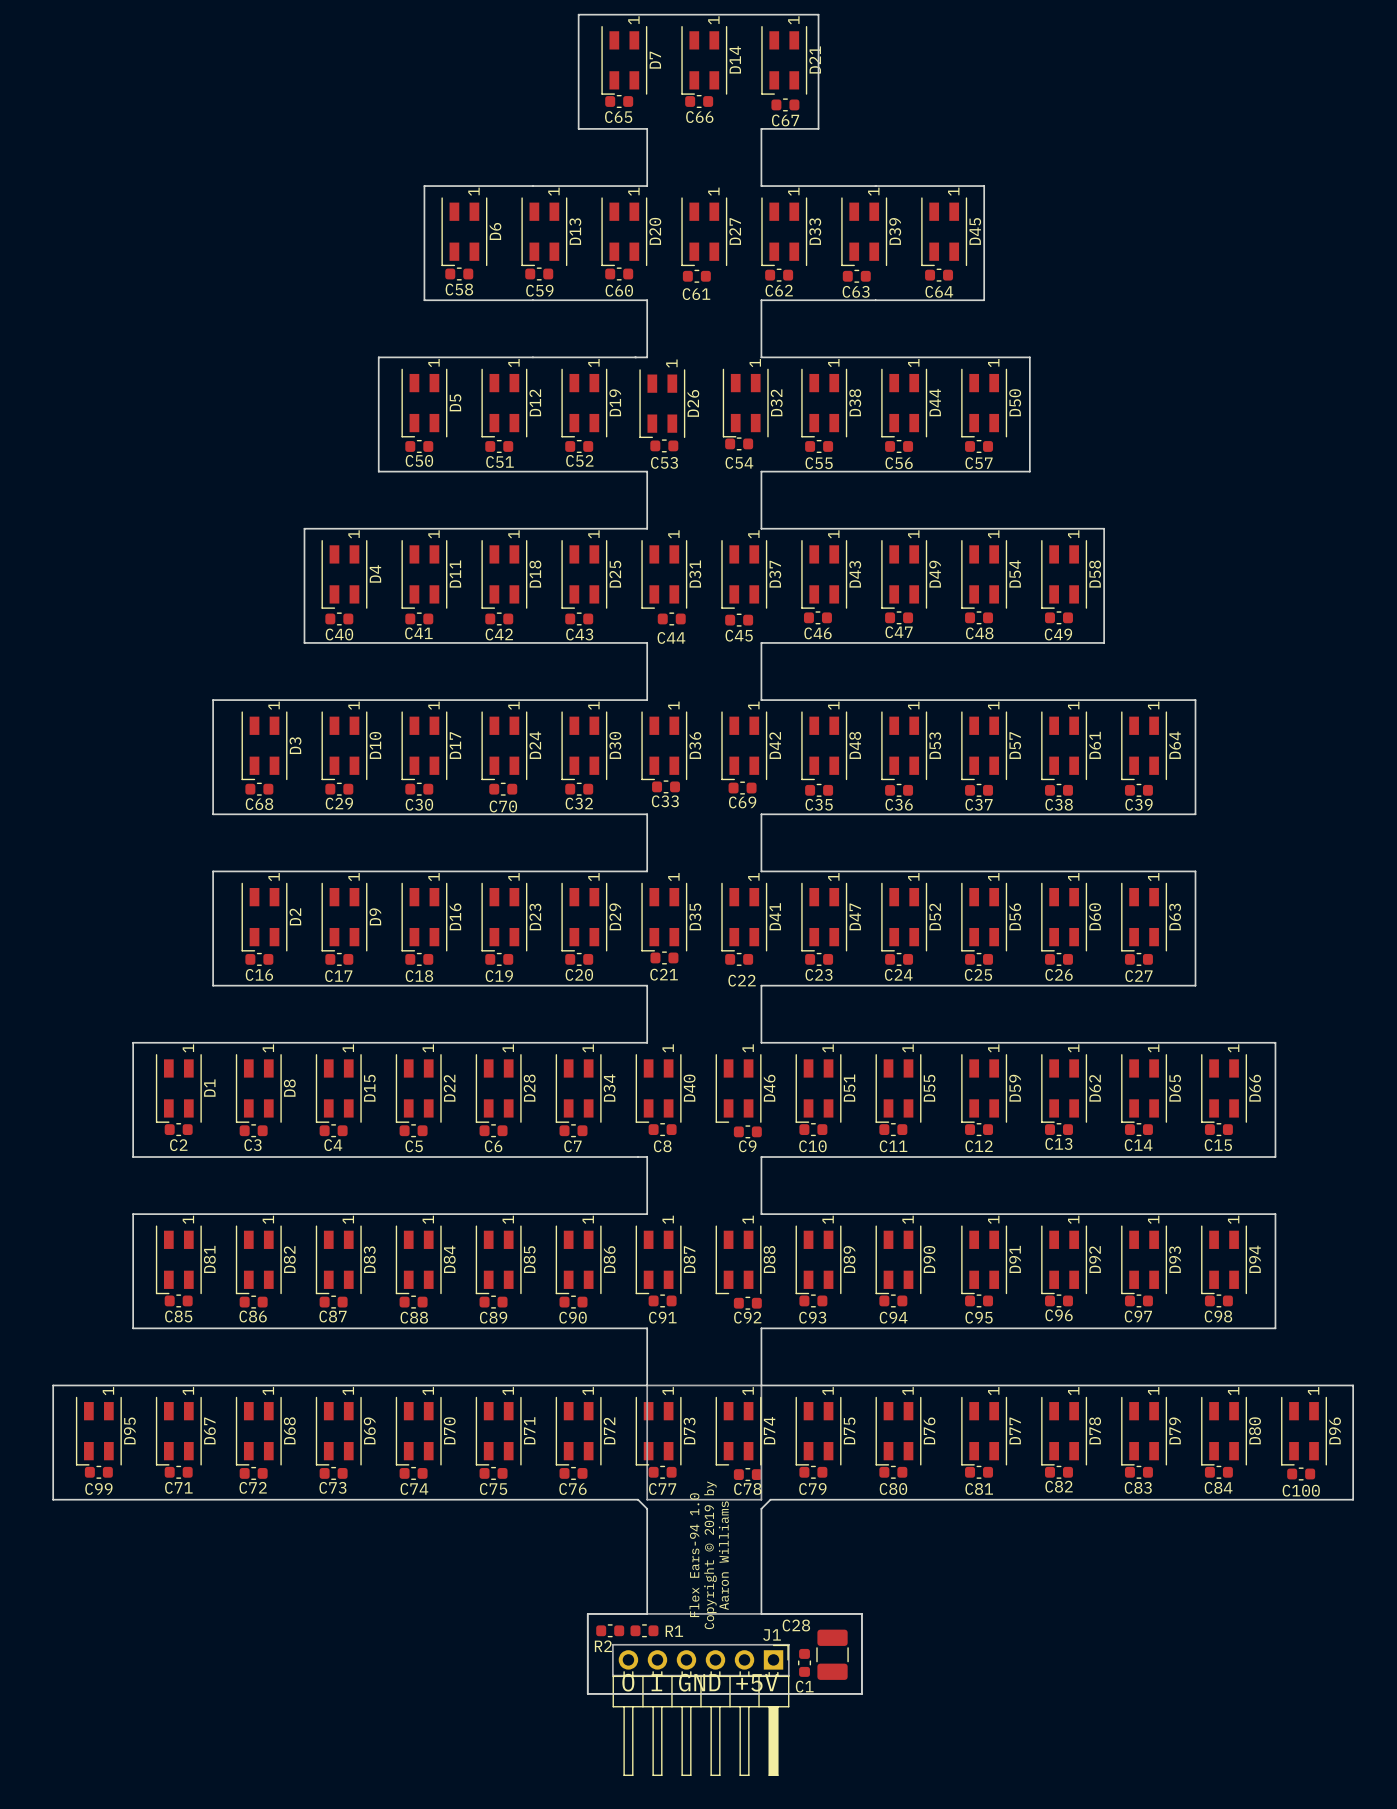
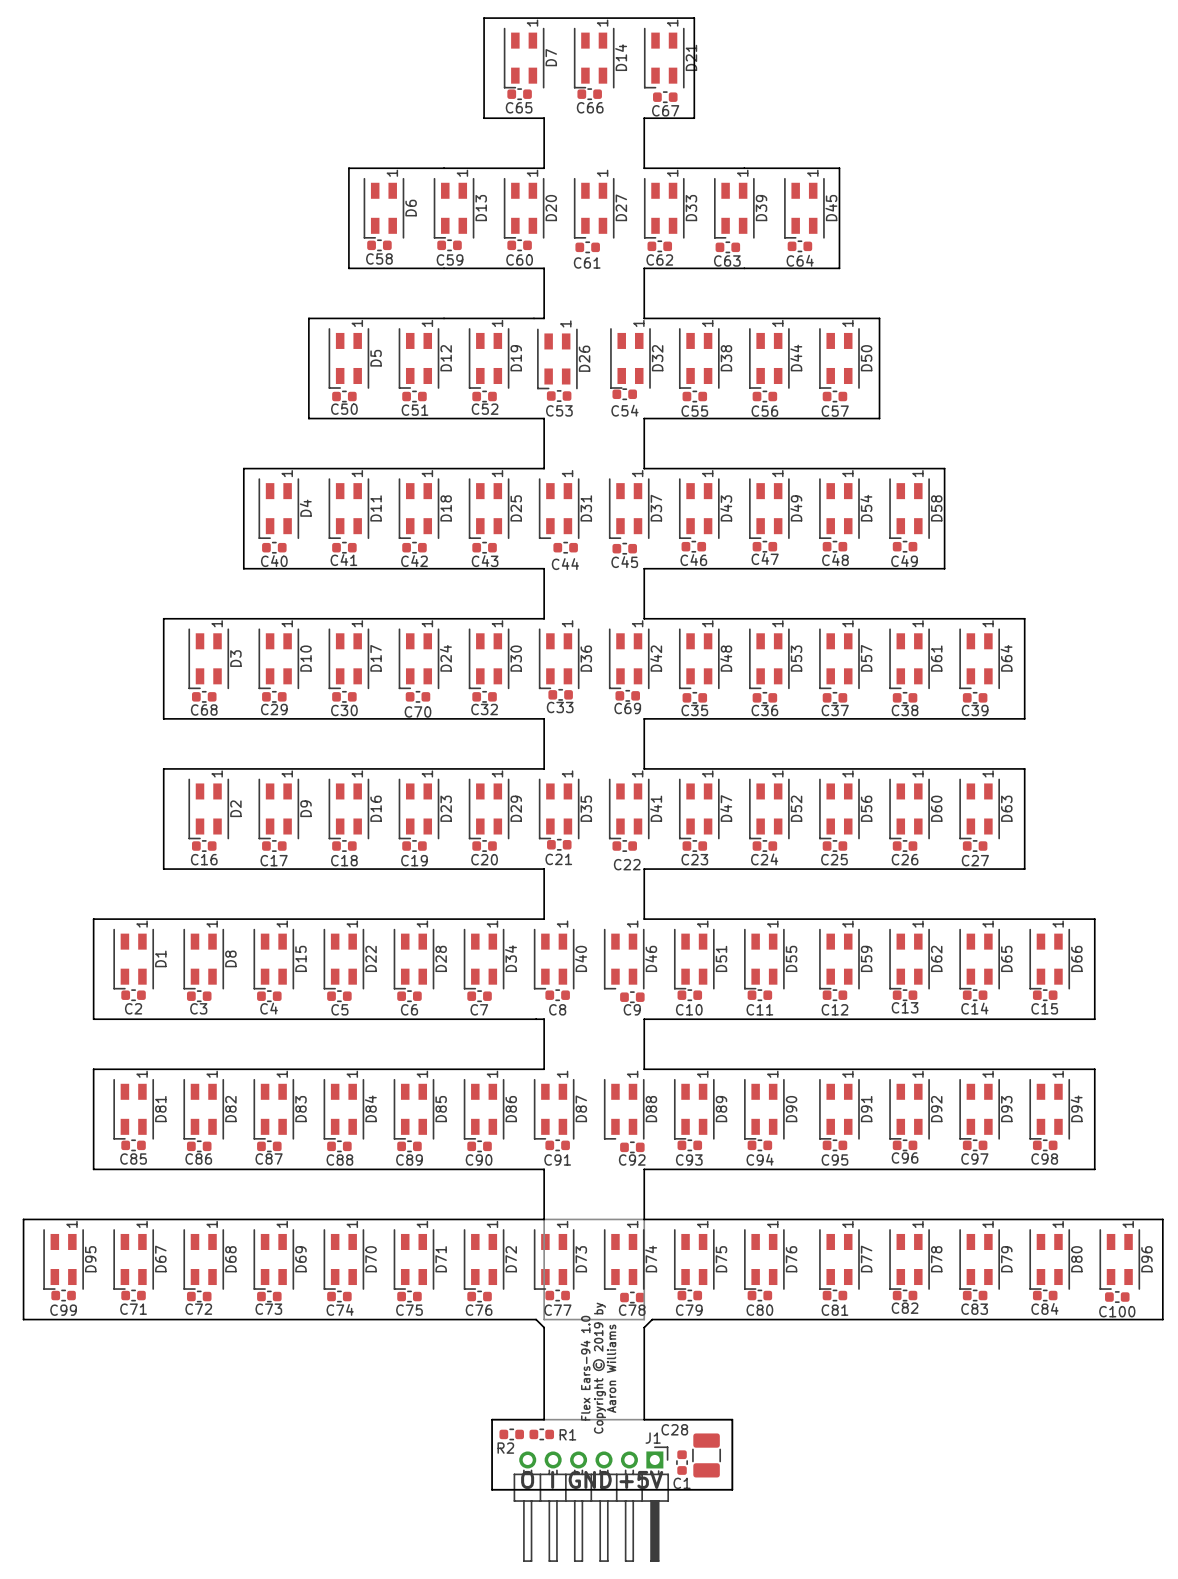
line: (612, 1644) (612, 1675) (788, 1675) (788, 1644) (612, 1644) -> none

